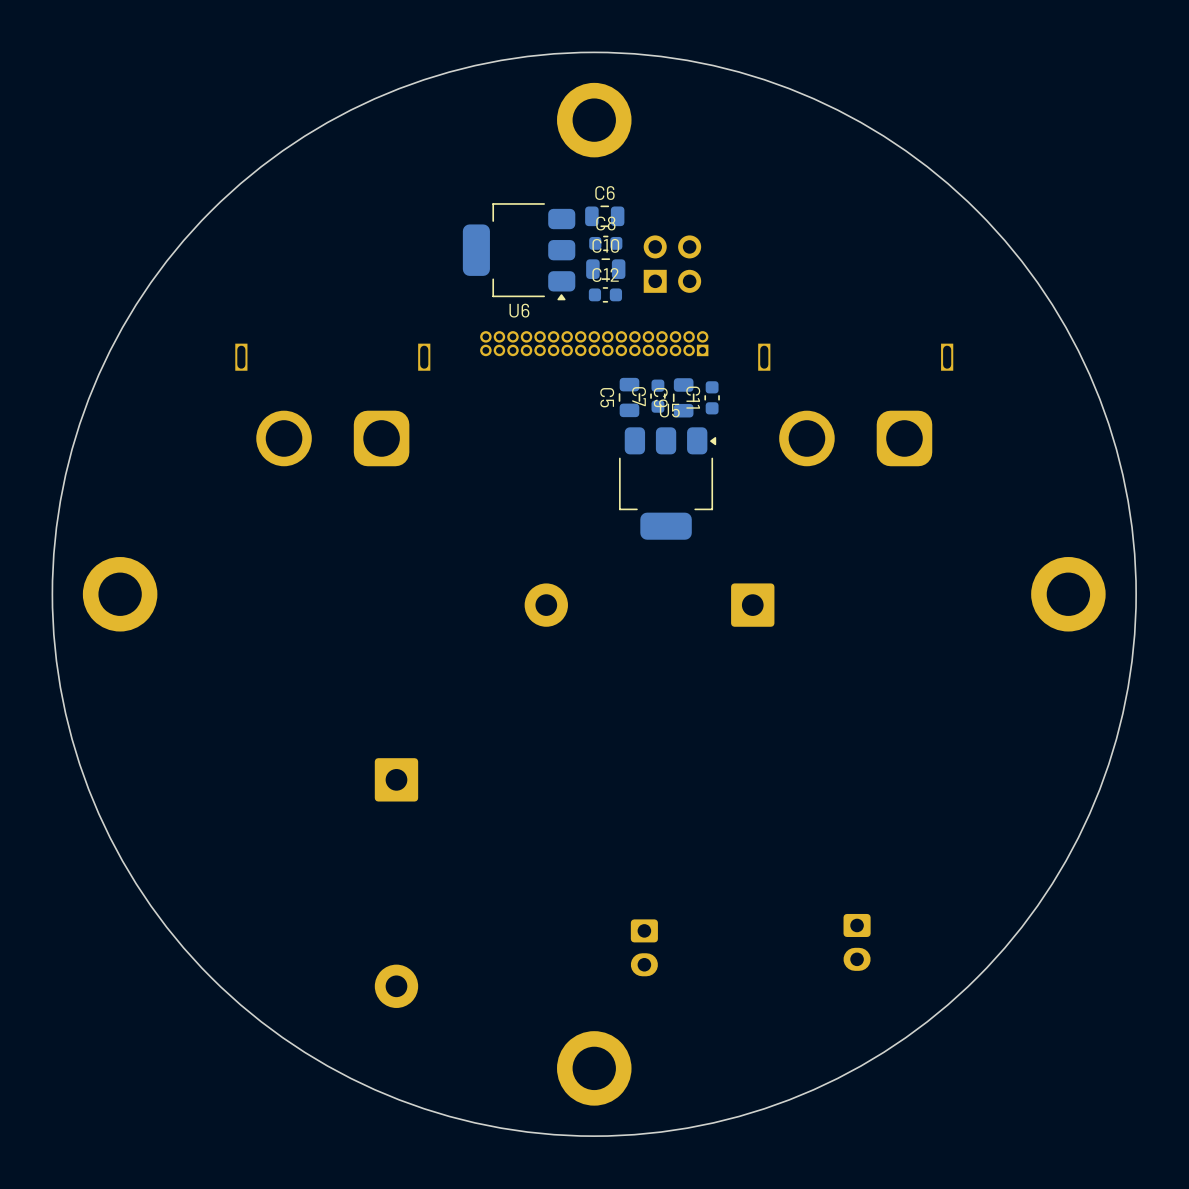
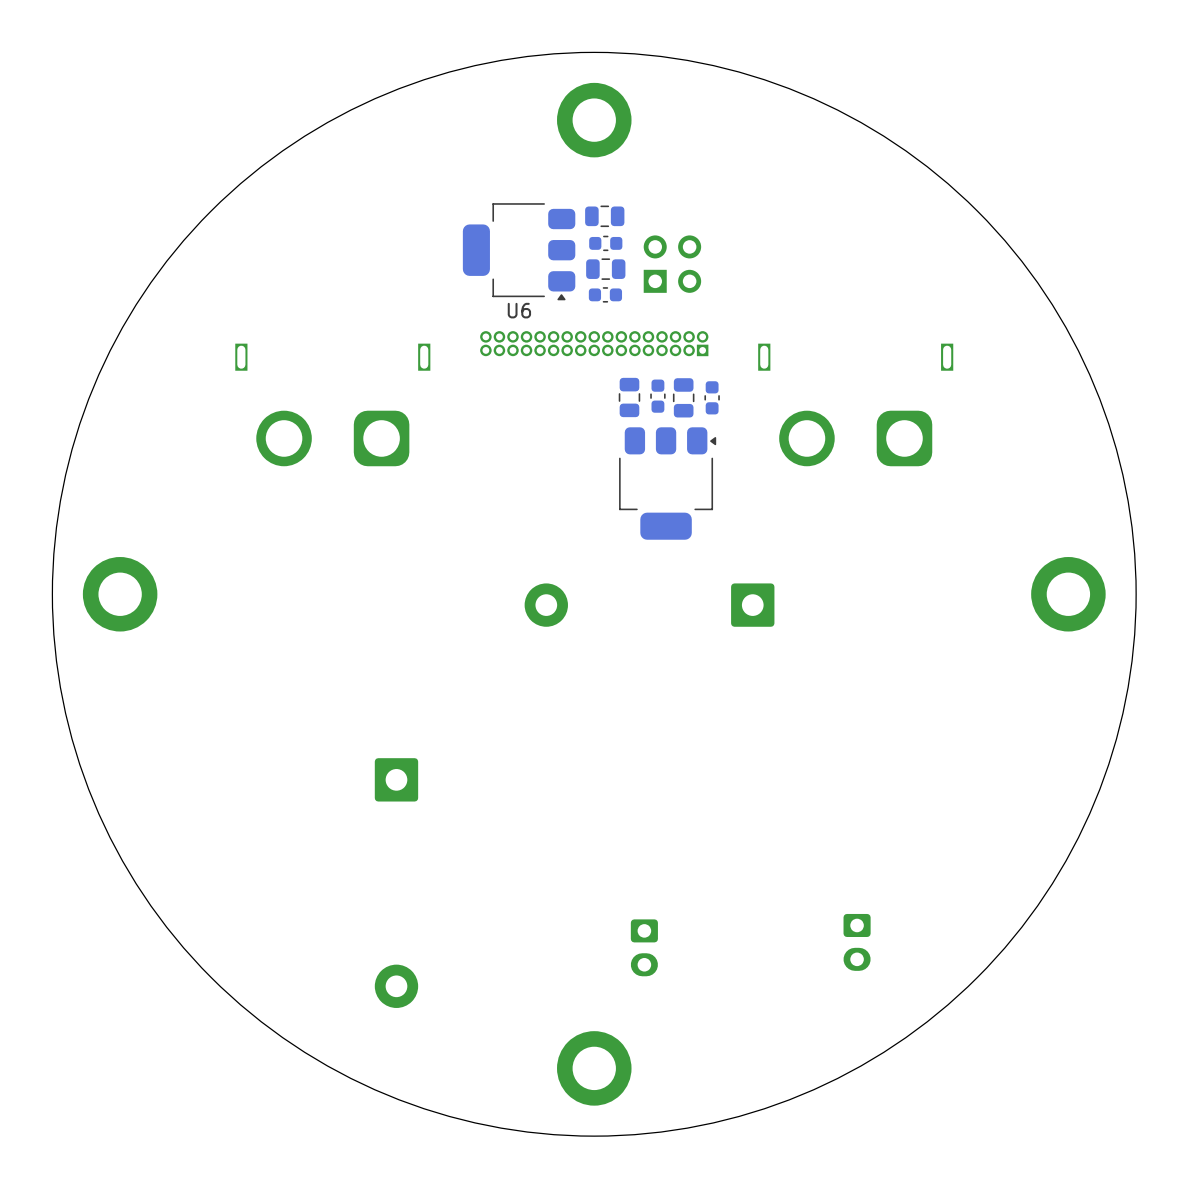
C6 name: C6 (604, 193) -> none
C8 name: C8 (605, 223) -> none
C10 name: C10 (605, 245) -> none
C12 name: C12 (605, 275) -> none
C7 name: C7 (639, 396) -> none
C5 name: C5 (607, 397) -> none
C9 name: C9 (660, 397) -> none
C11 name: C11 (693, 397) -> none
U5 name: U5 (669, 410) -> none

